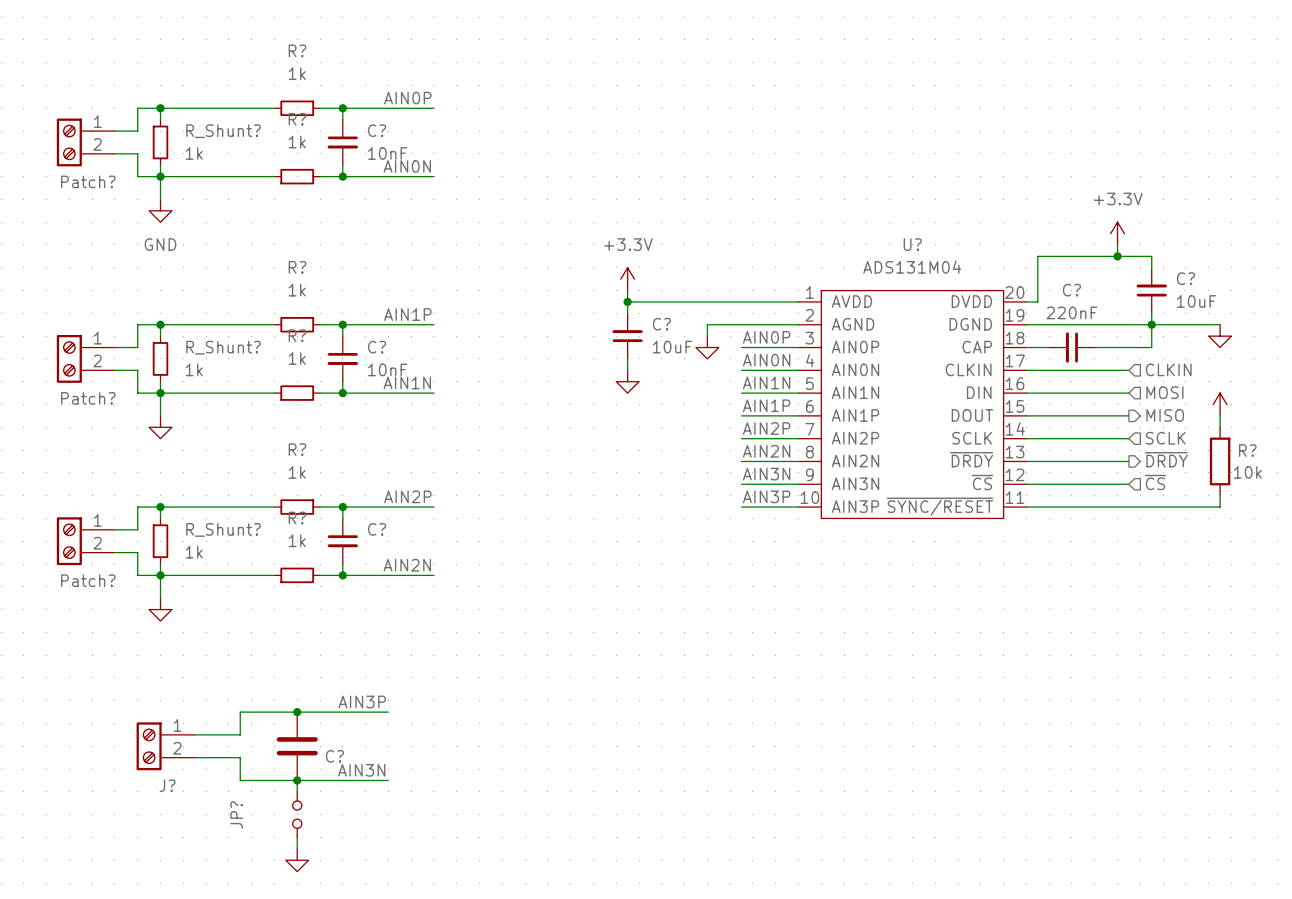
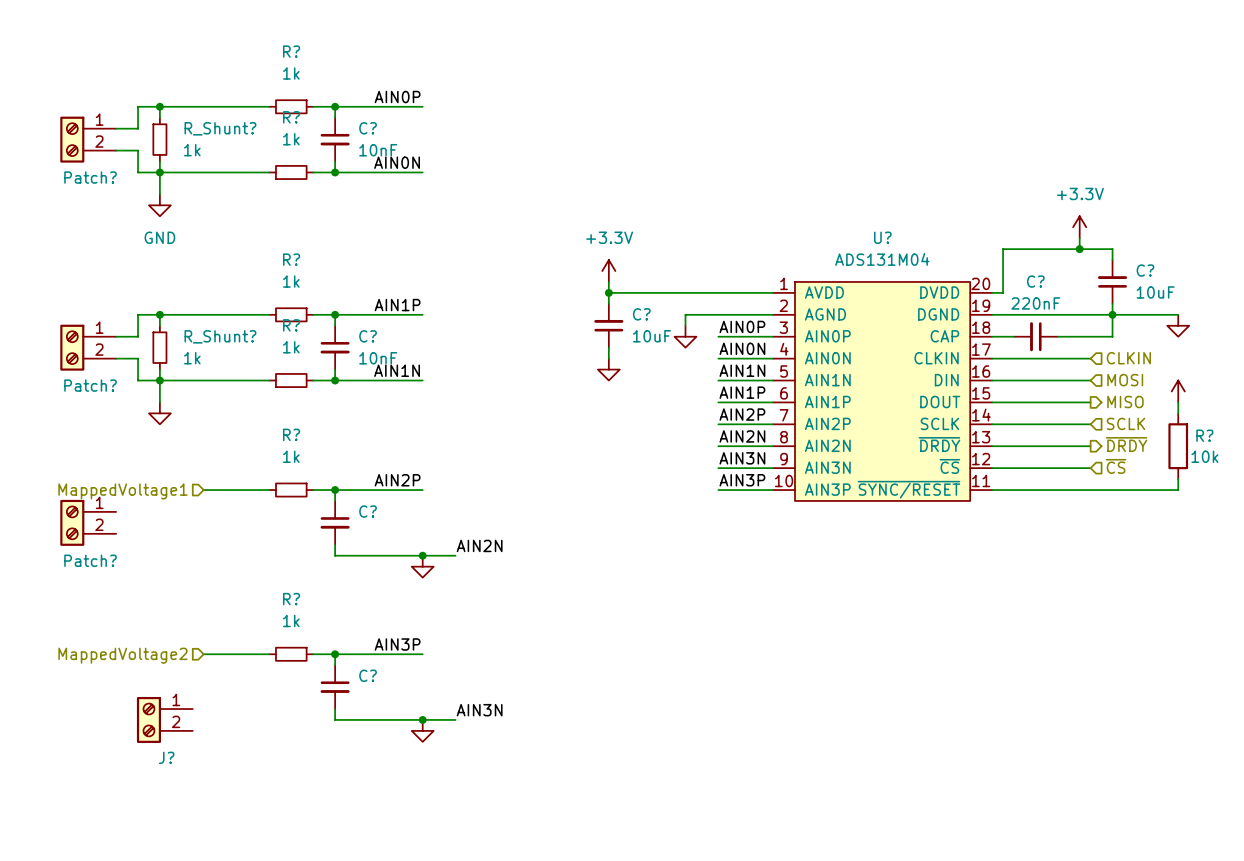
wire: (160, 507) (160, 518) -> none
junction: (160, 507) -> none
wire: (206, 507) (137, 507) (137, 529) (114, 529) -> none
hierarchical label: none -> MappedVoltage1 (122, 491)
R_Shunt?: 1k (160, 541) -> none
wire: (114, 552) (137, 552) (137, 575) (274, 575) -> none
wire: (160, 564) (160, 598) -> none
label position: AIN2N (407, 565) -> AIN2N (479, 545)
junction: (160, 575) -> none
R? position: (297, 575) -> (291, 654)
wire: (320, 575) (342, 575) -> none
junction: (342, 575) -> none
wire: none -> (422, 555) (455, 555)
junction: none -> (422, 555)
power symbol: none -> (422, 566)
power symbol: (160, 609) -> none
wire: none -> (203, 654) (269, 654)
wire: none -> (313, 654) (422, 654)
junction: none -> (335, 654)
hierarchical label: none -> MappedVoltage2 (122, 655)
label position: AIN3P (362, 701) -> AIN3P (397, 644)
junction: (297, 712) -> none
C?: none -> (335, 687)
wire: (388, 712) (240, 712) (240, 734) (194, 734) -> none
wire: none -> (335, 709) (335, 719) (455, 719)
C?: (297, 746) -> none
junction: none -> (422, 719)
wire: (194, 757) (240, 757) (240, 780) (388, 780) -> none
power symbol: none -> (422, 730)
label position: AIN3N (361, 770) -> AIN3N (479, 710)
wire: (297, 780) (297, 791) -> (335, 654) (335, 665)
junction: (297, 780) -> none
JP?: (297, 814) -> none
wire: (297, 837) (297, 848) -> none
power symbol: (297, 860) -> none

